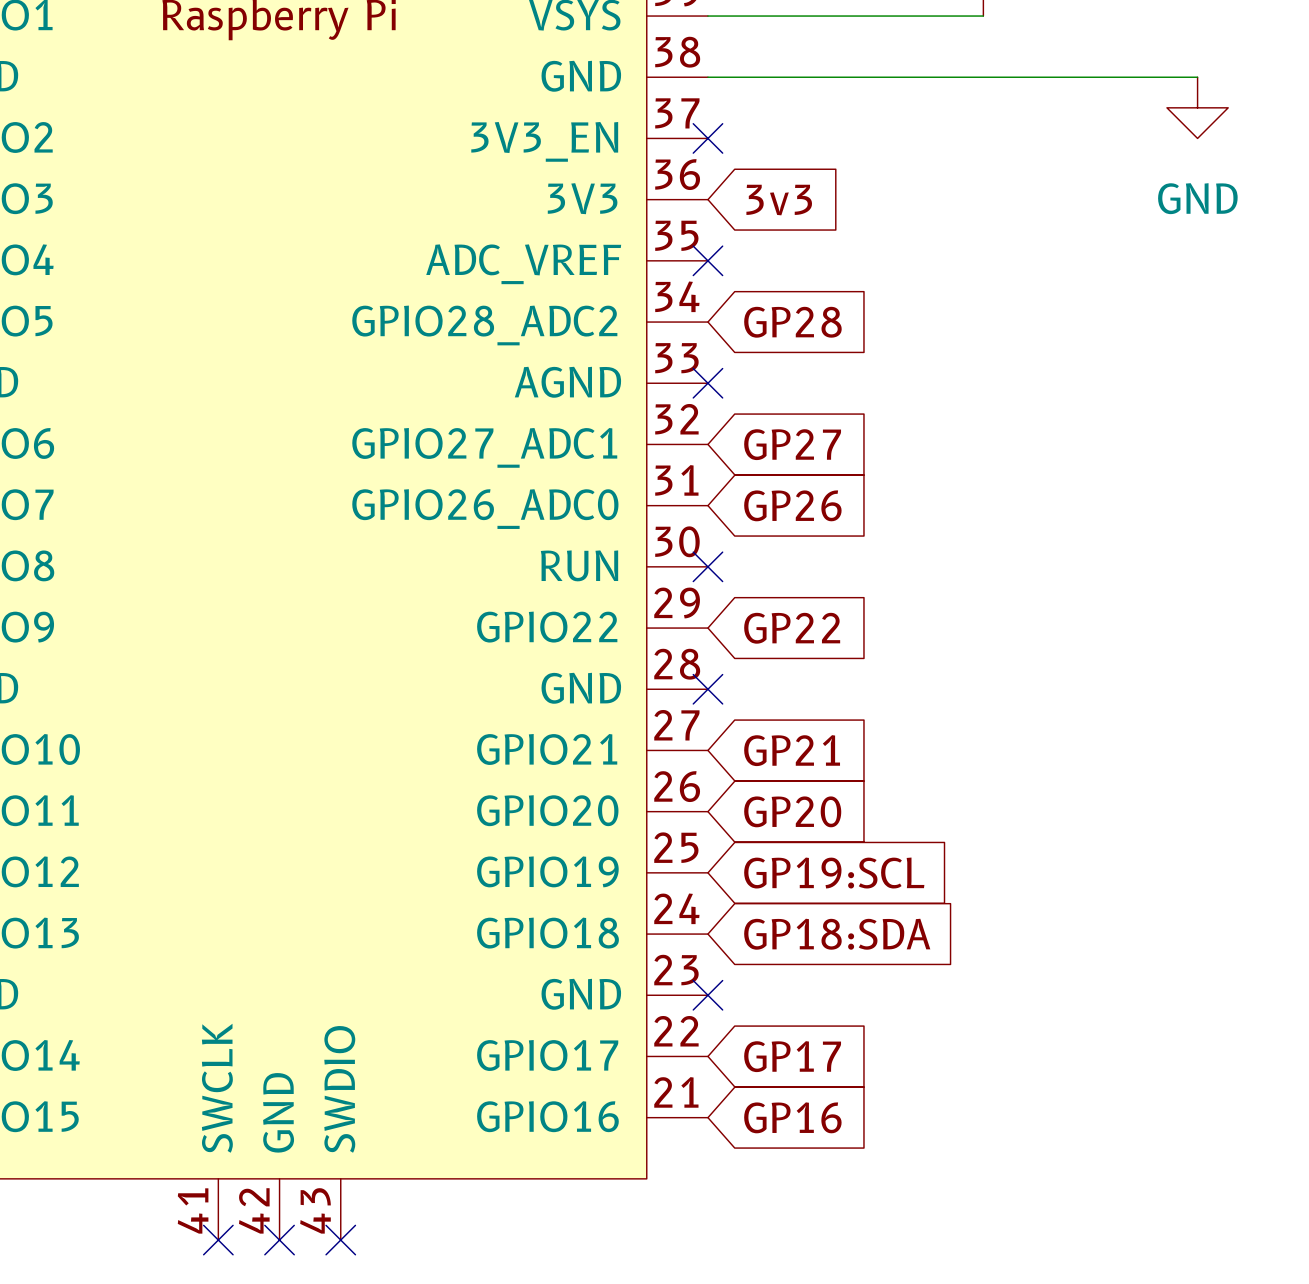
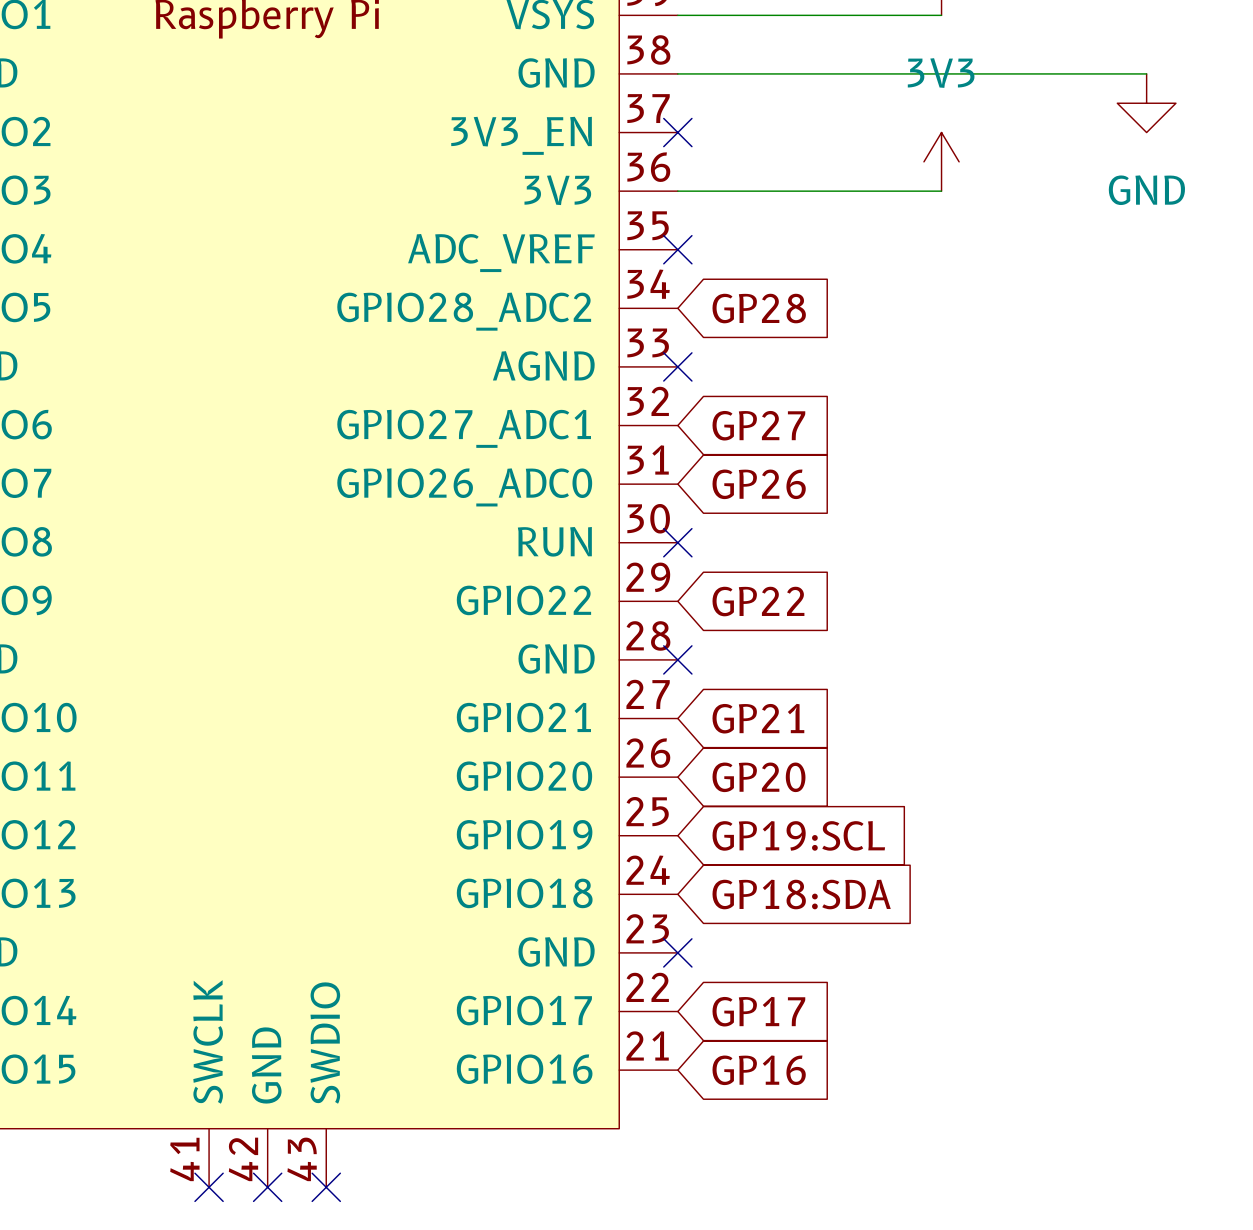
power symbol: none -> 3V3 (941, 161)
wire: none -> (677, 191) (941, 191)
global label: 3v3 (779, 200) -> none

